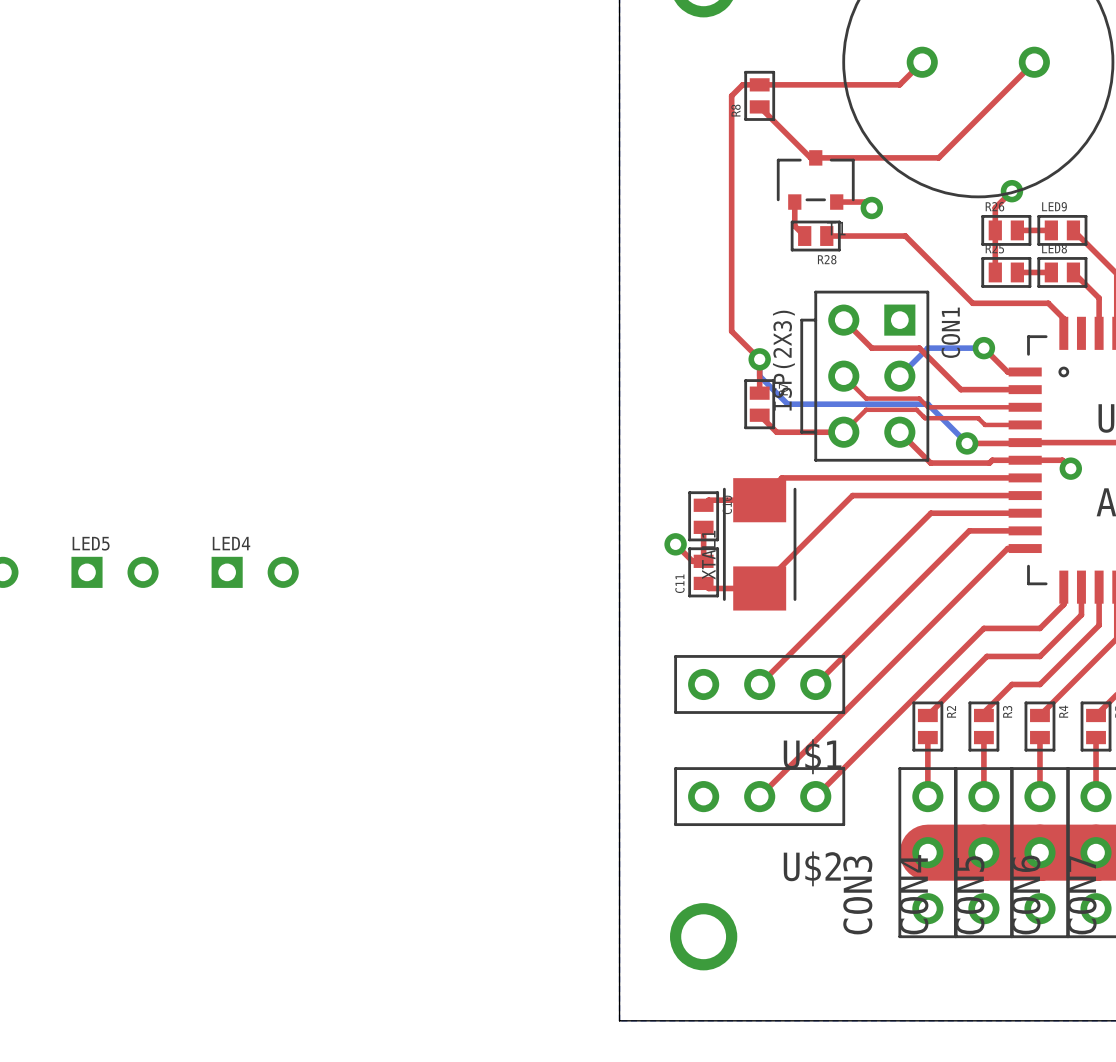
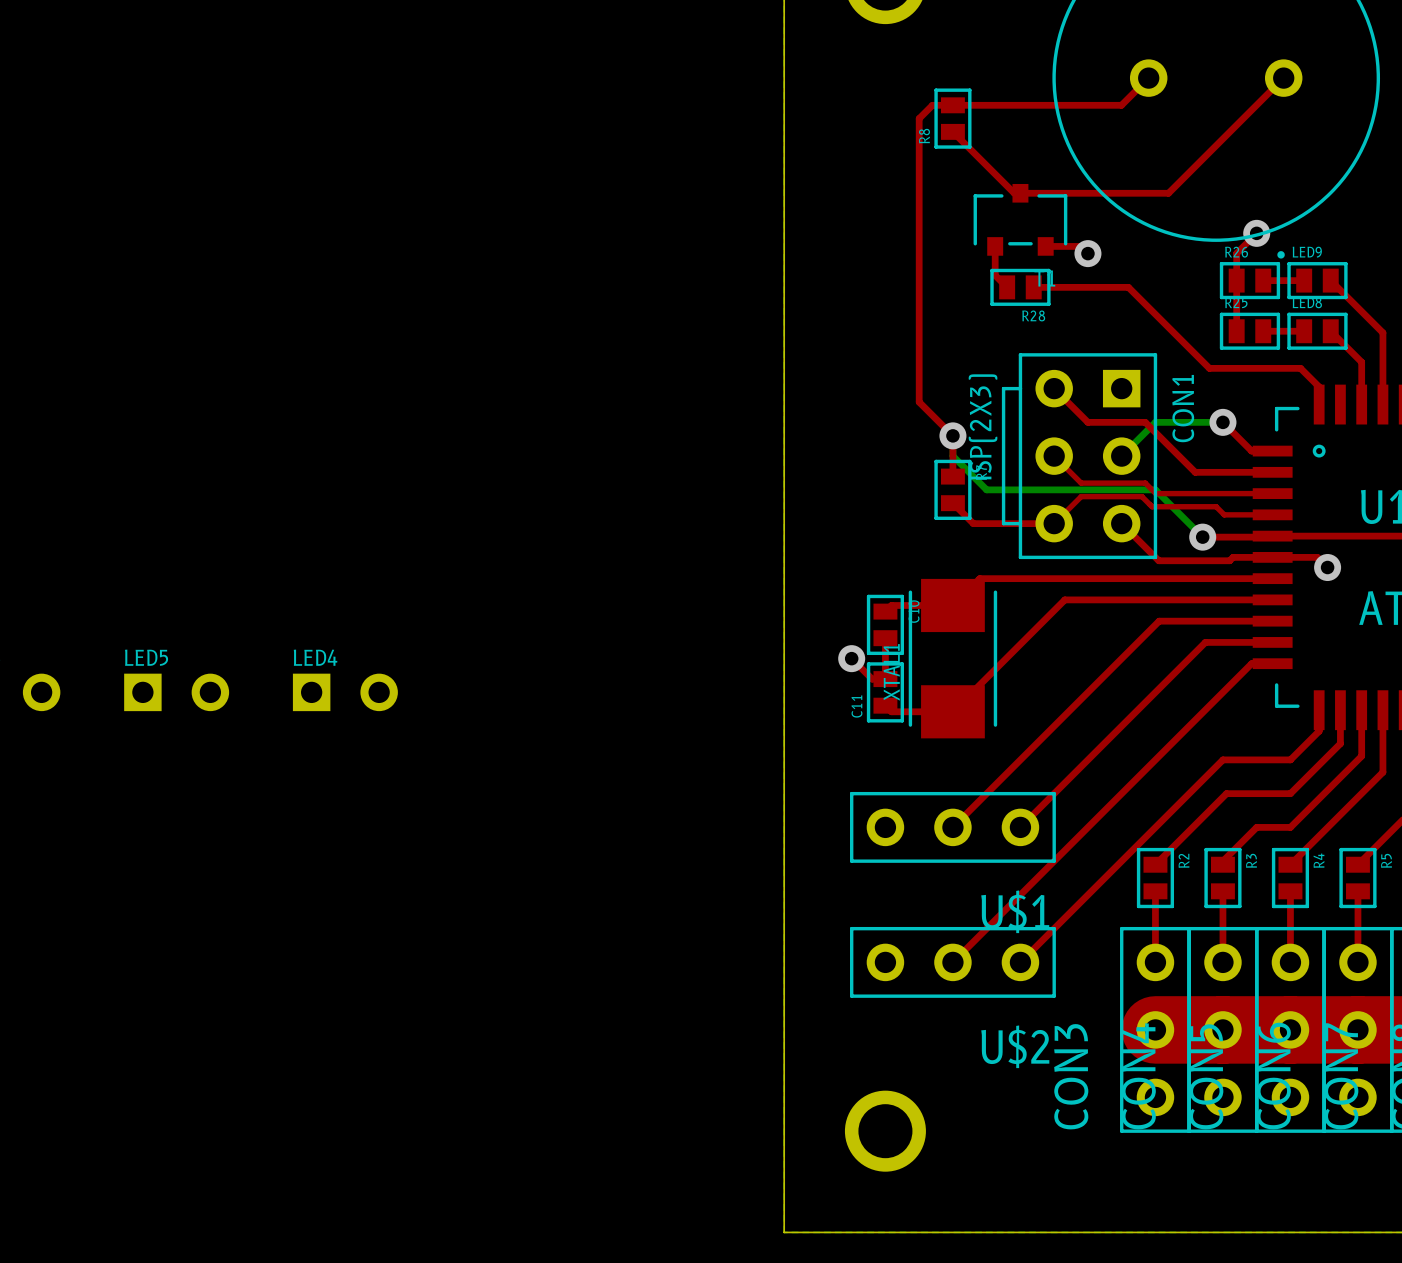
LED9 footprint: [1037, 215, 1088, 246] -> [1277, 251, 1348, 300]

